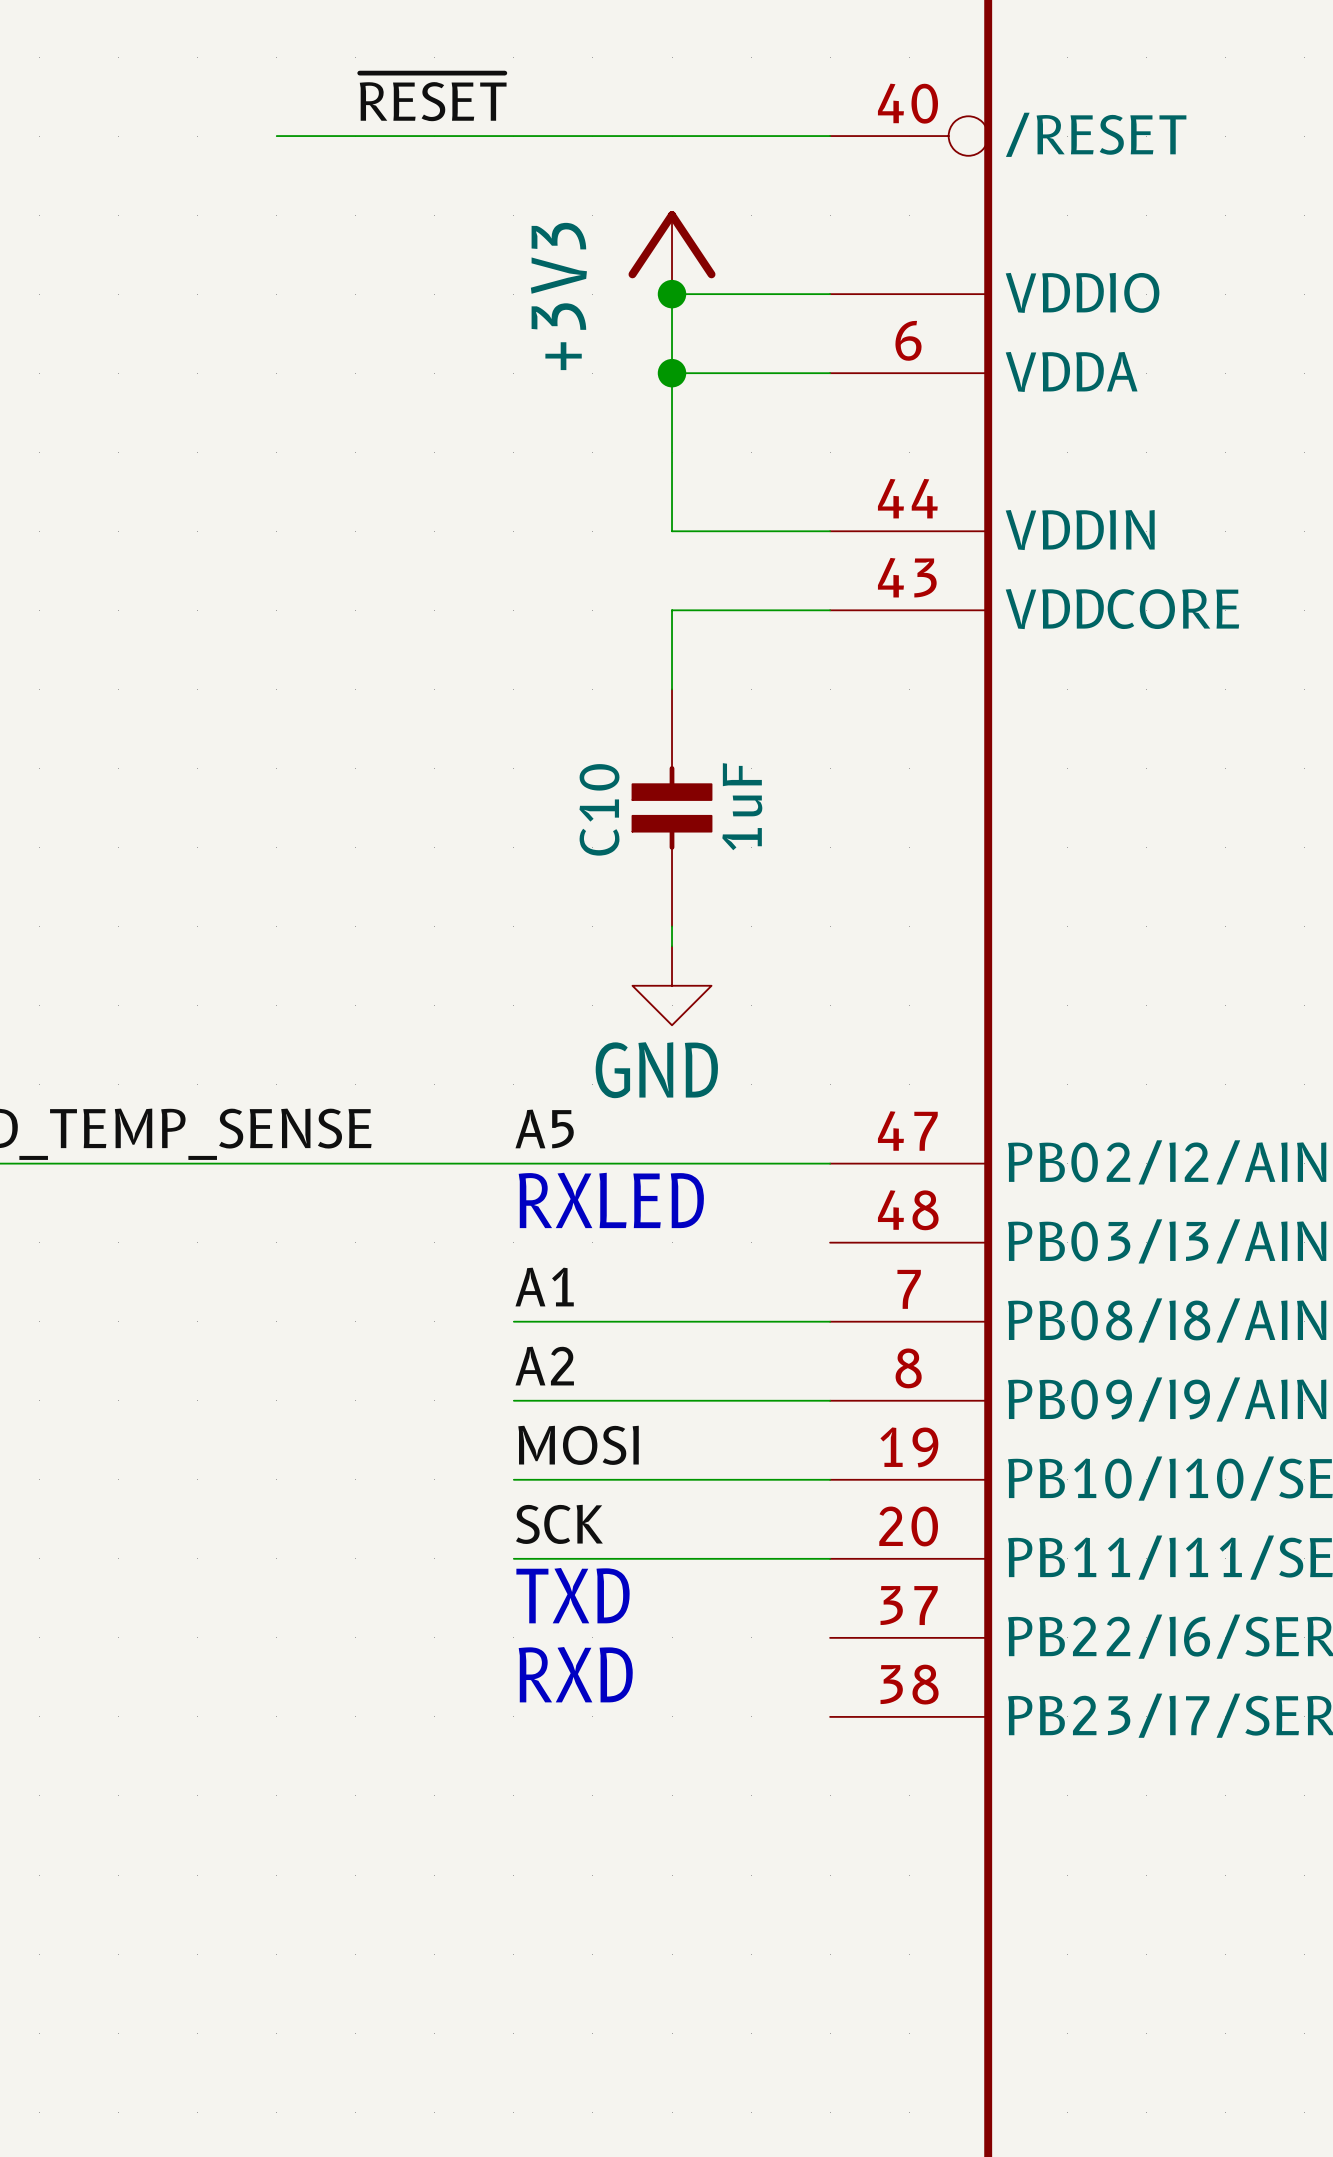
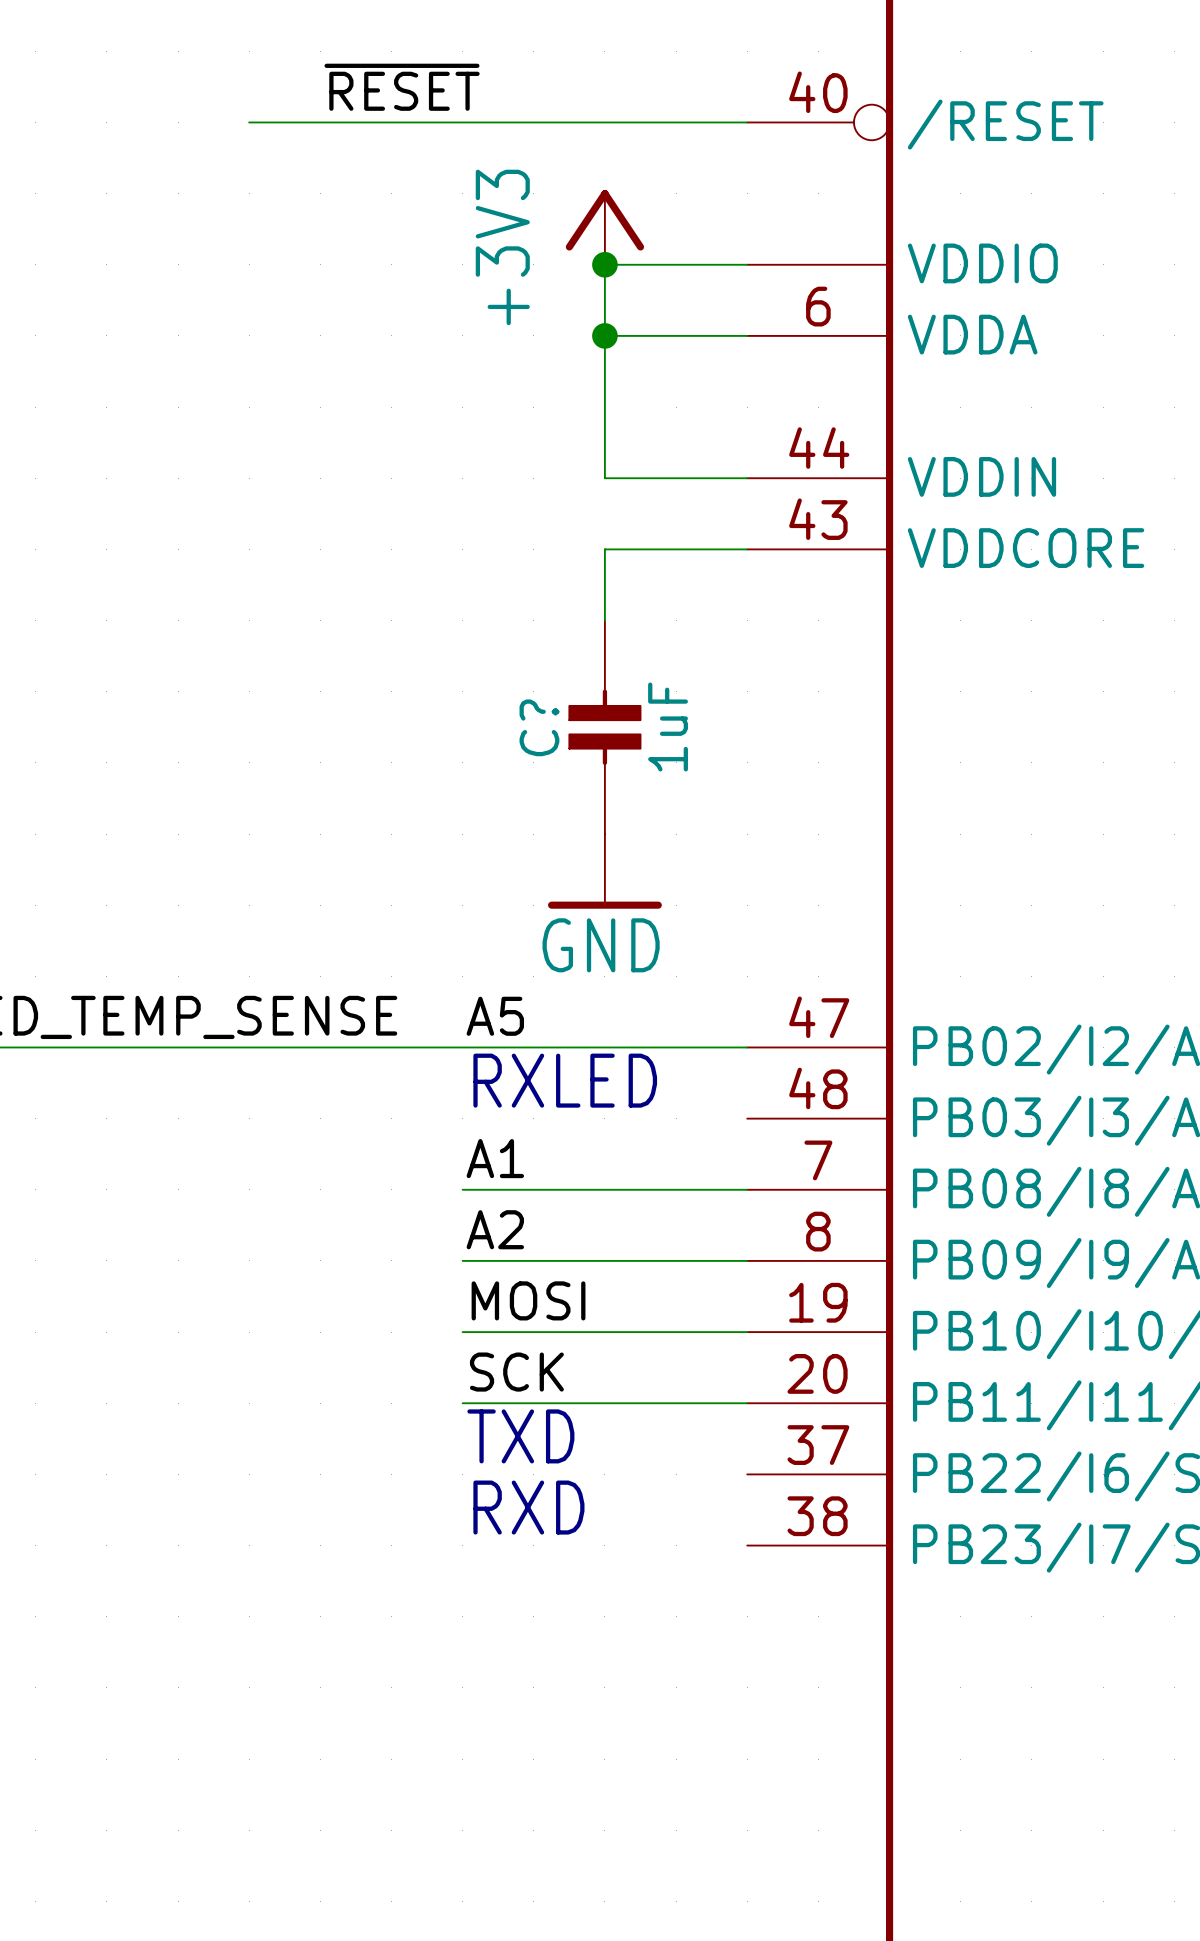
C10 name: C10 (599, 809) -> C? (539, 727)
power symbol shape: [632, 946, 712, 1026] -> [548, 834, 662, 909]

